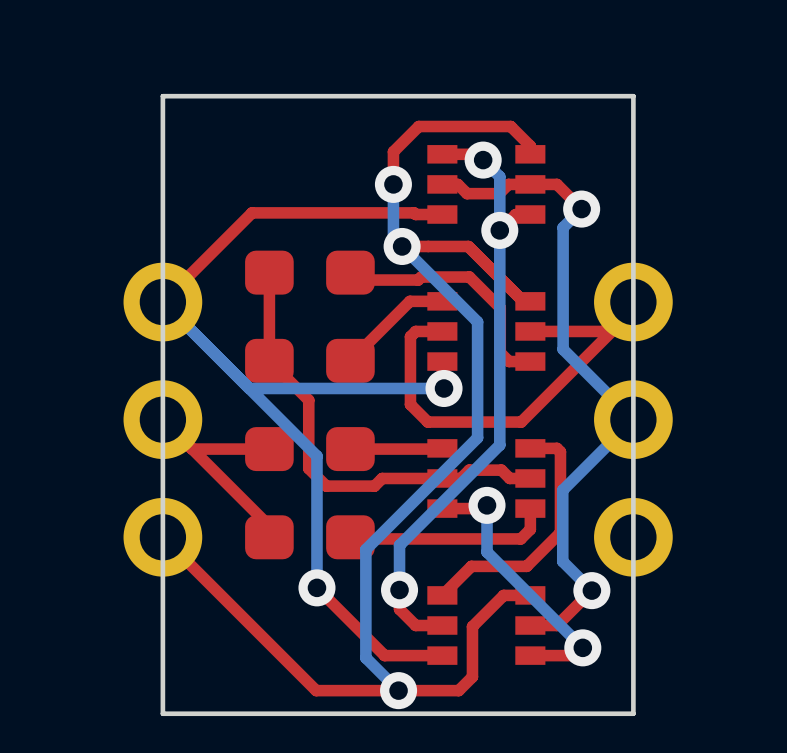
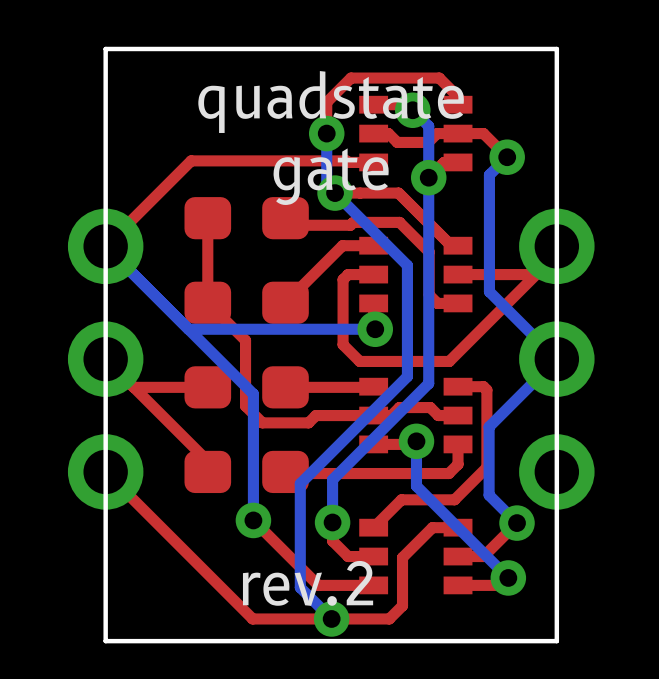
text: none -> quadstate (331, 102)
text: none -> gate (331, 176)
text: none -> rev.2 (308, 583)

